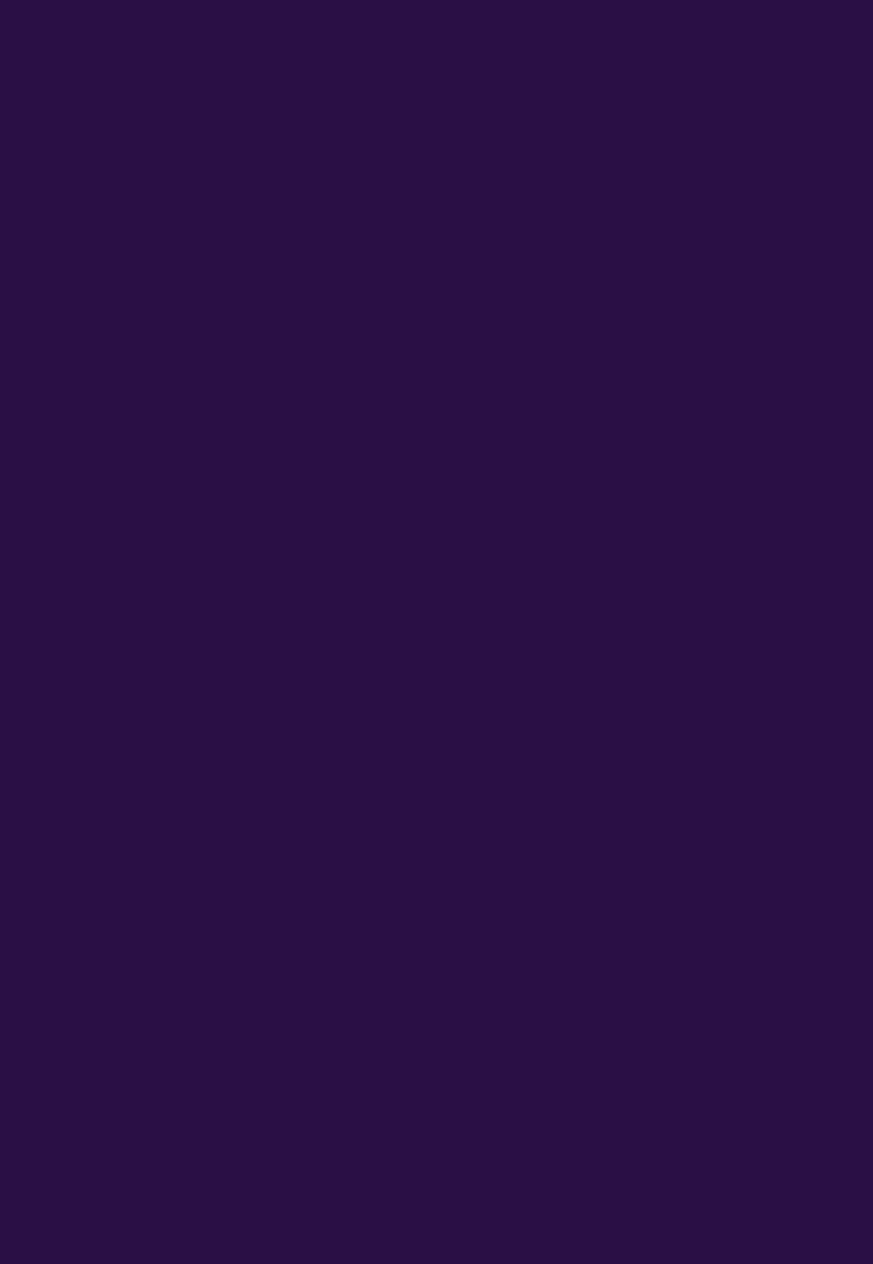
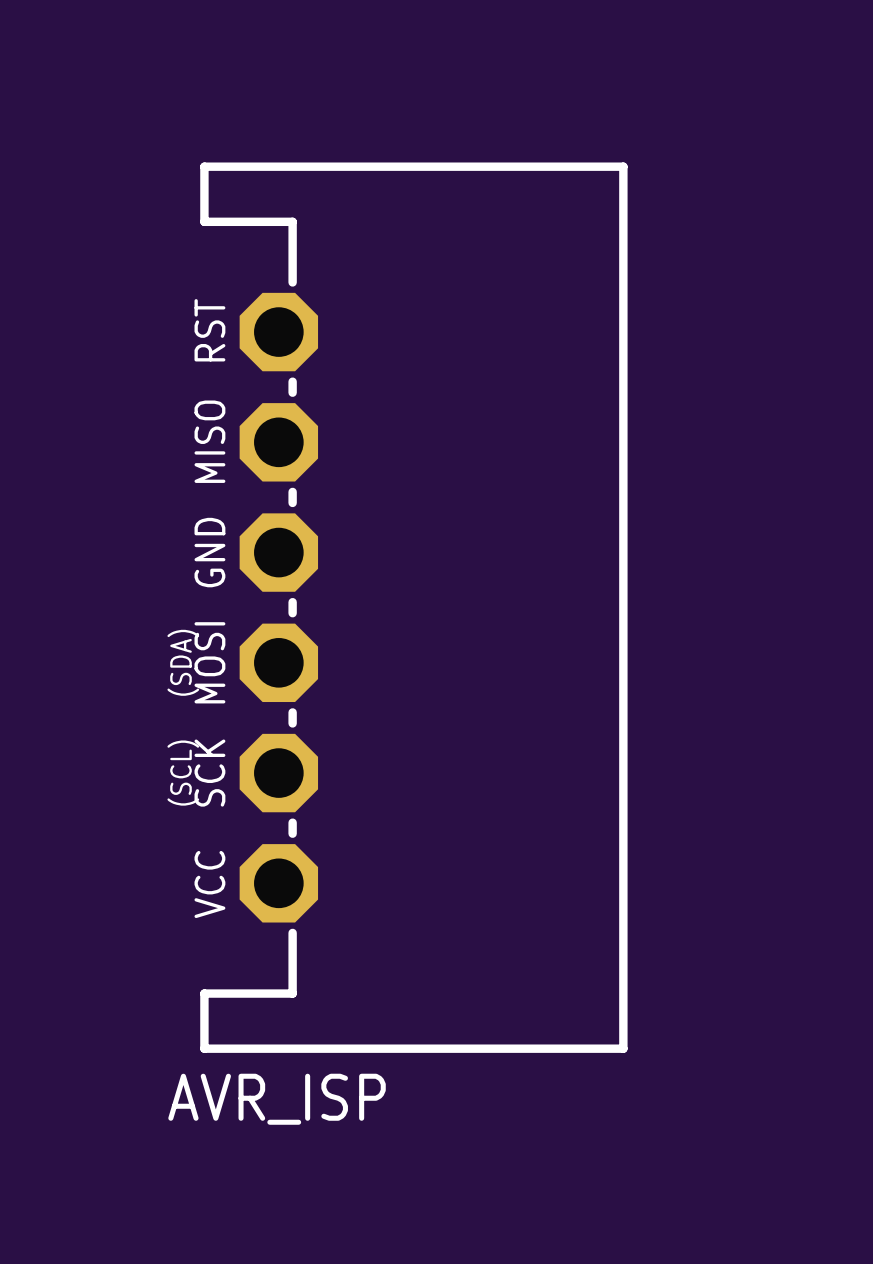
AVR_ISP: none -> (413, 607)

